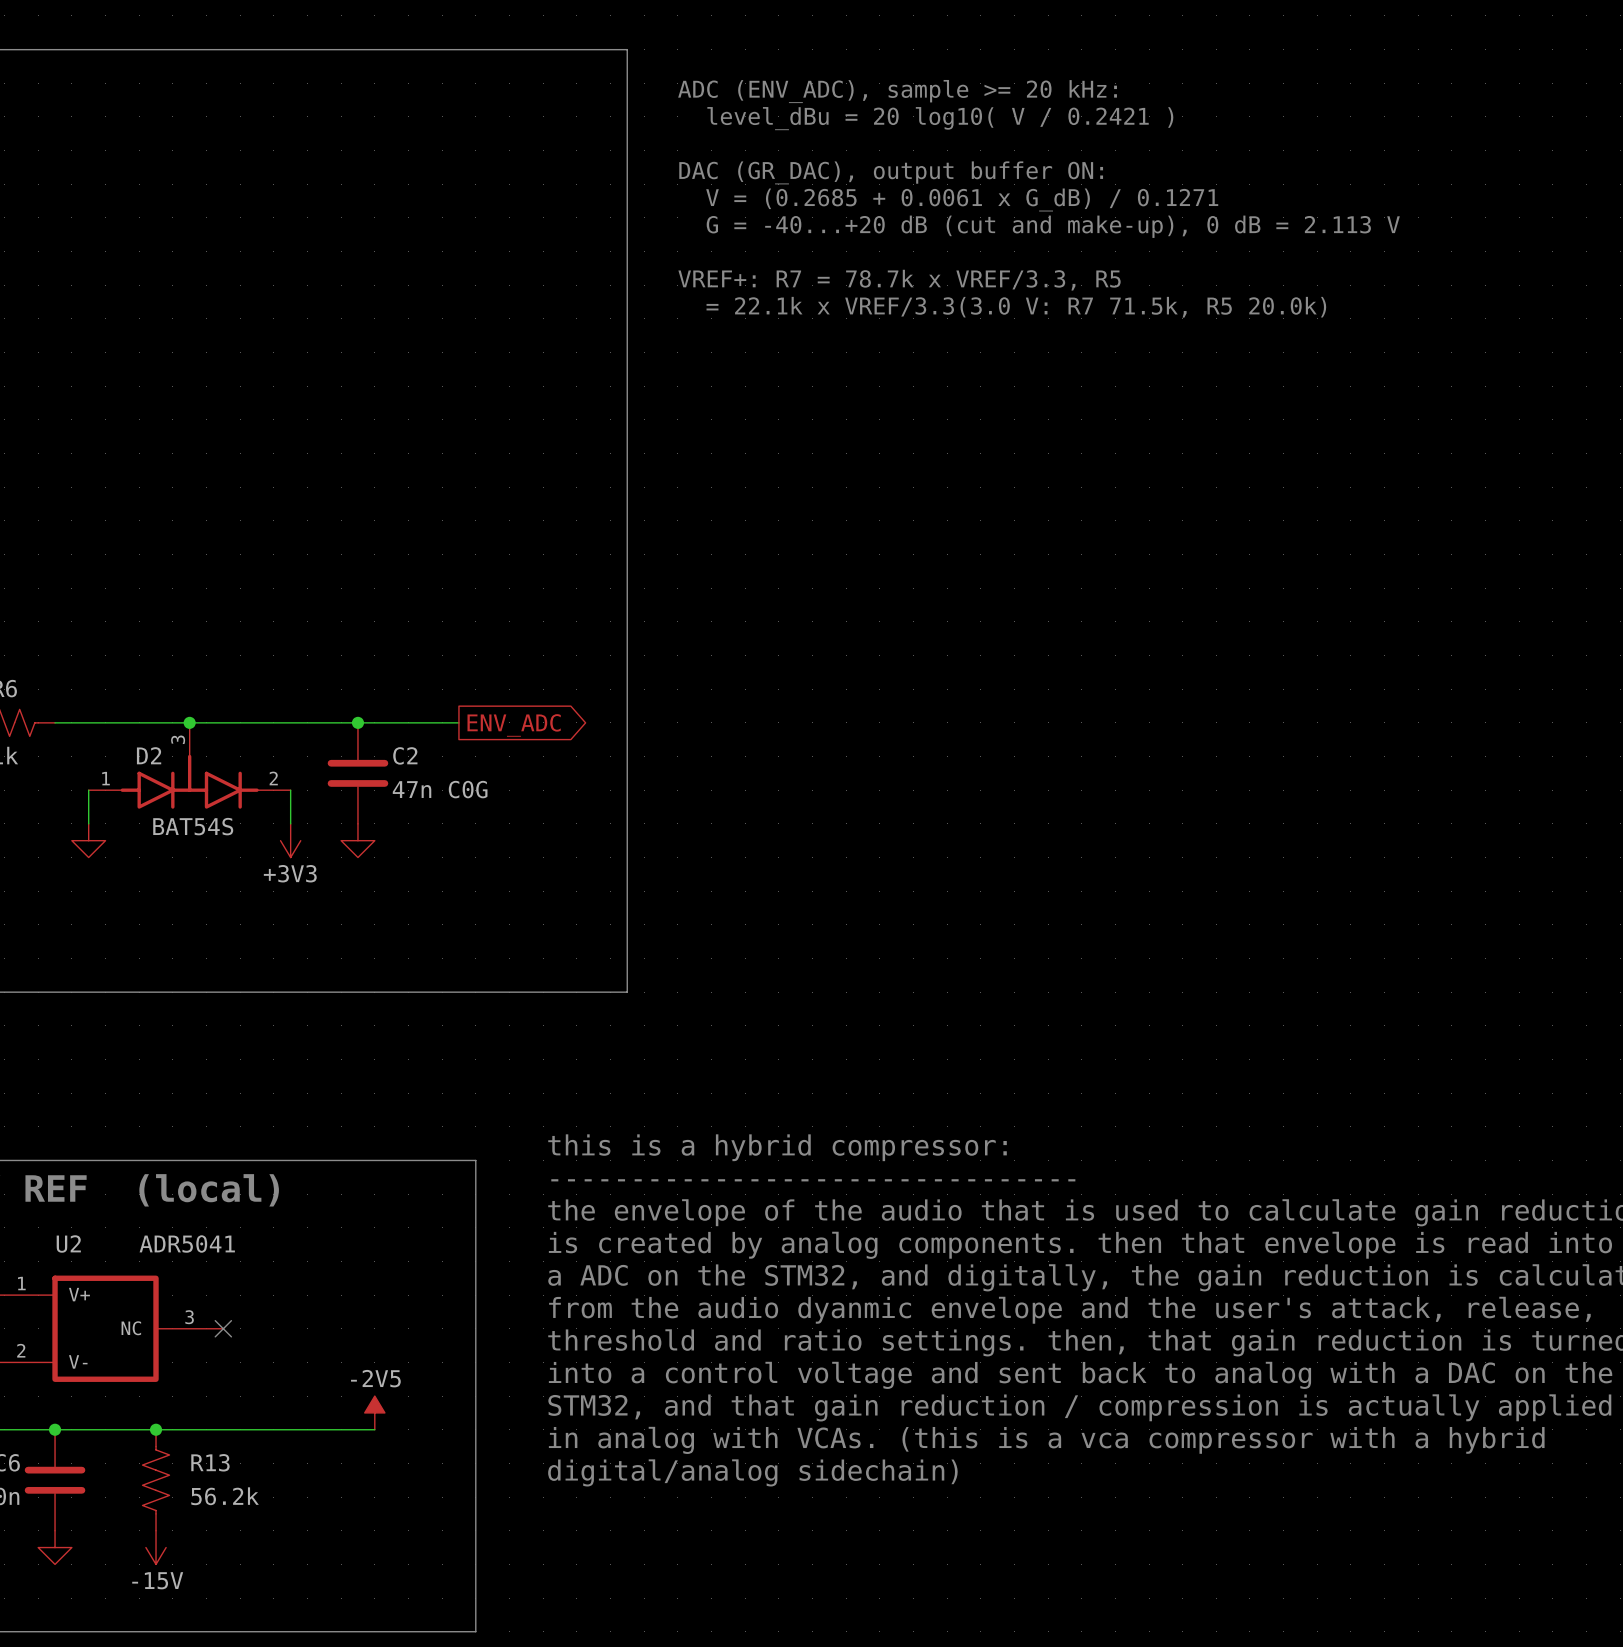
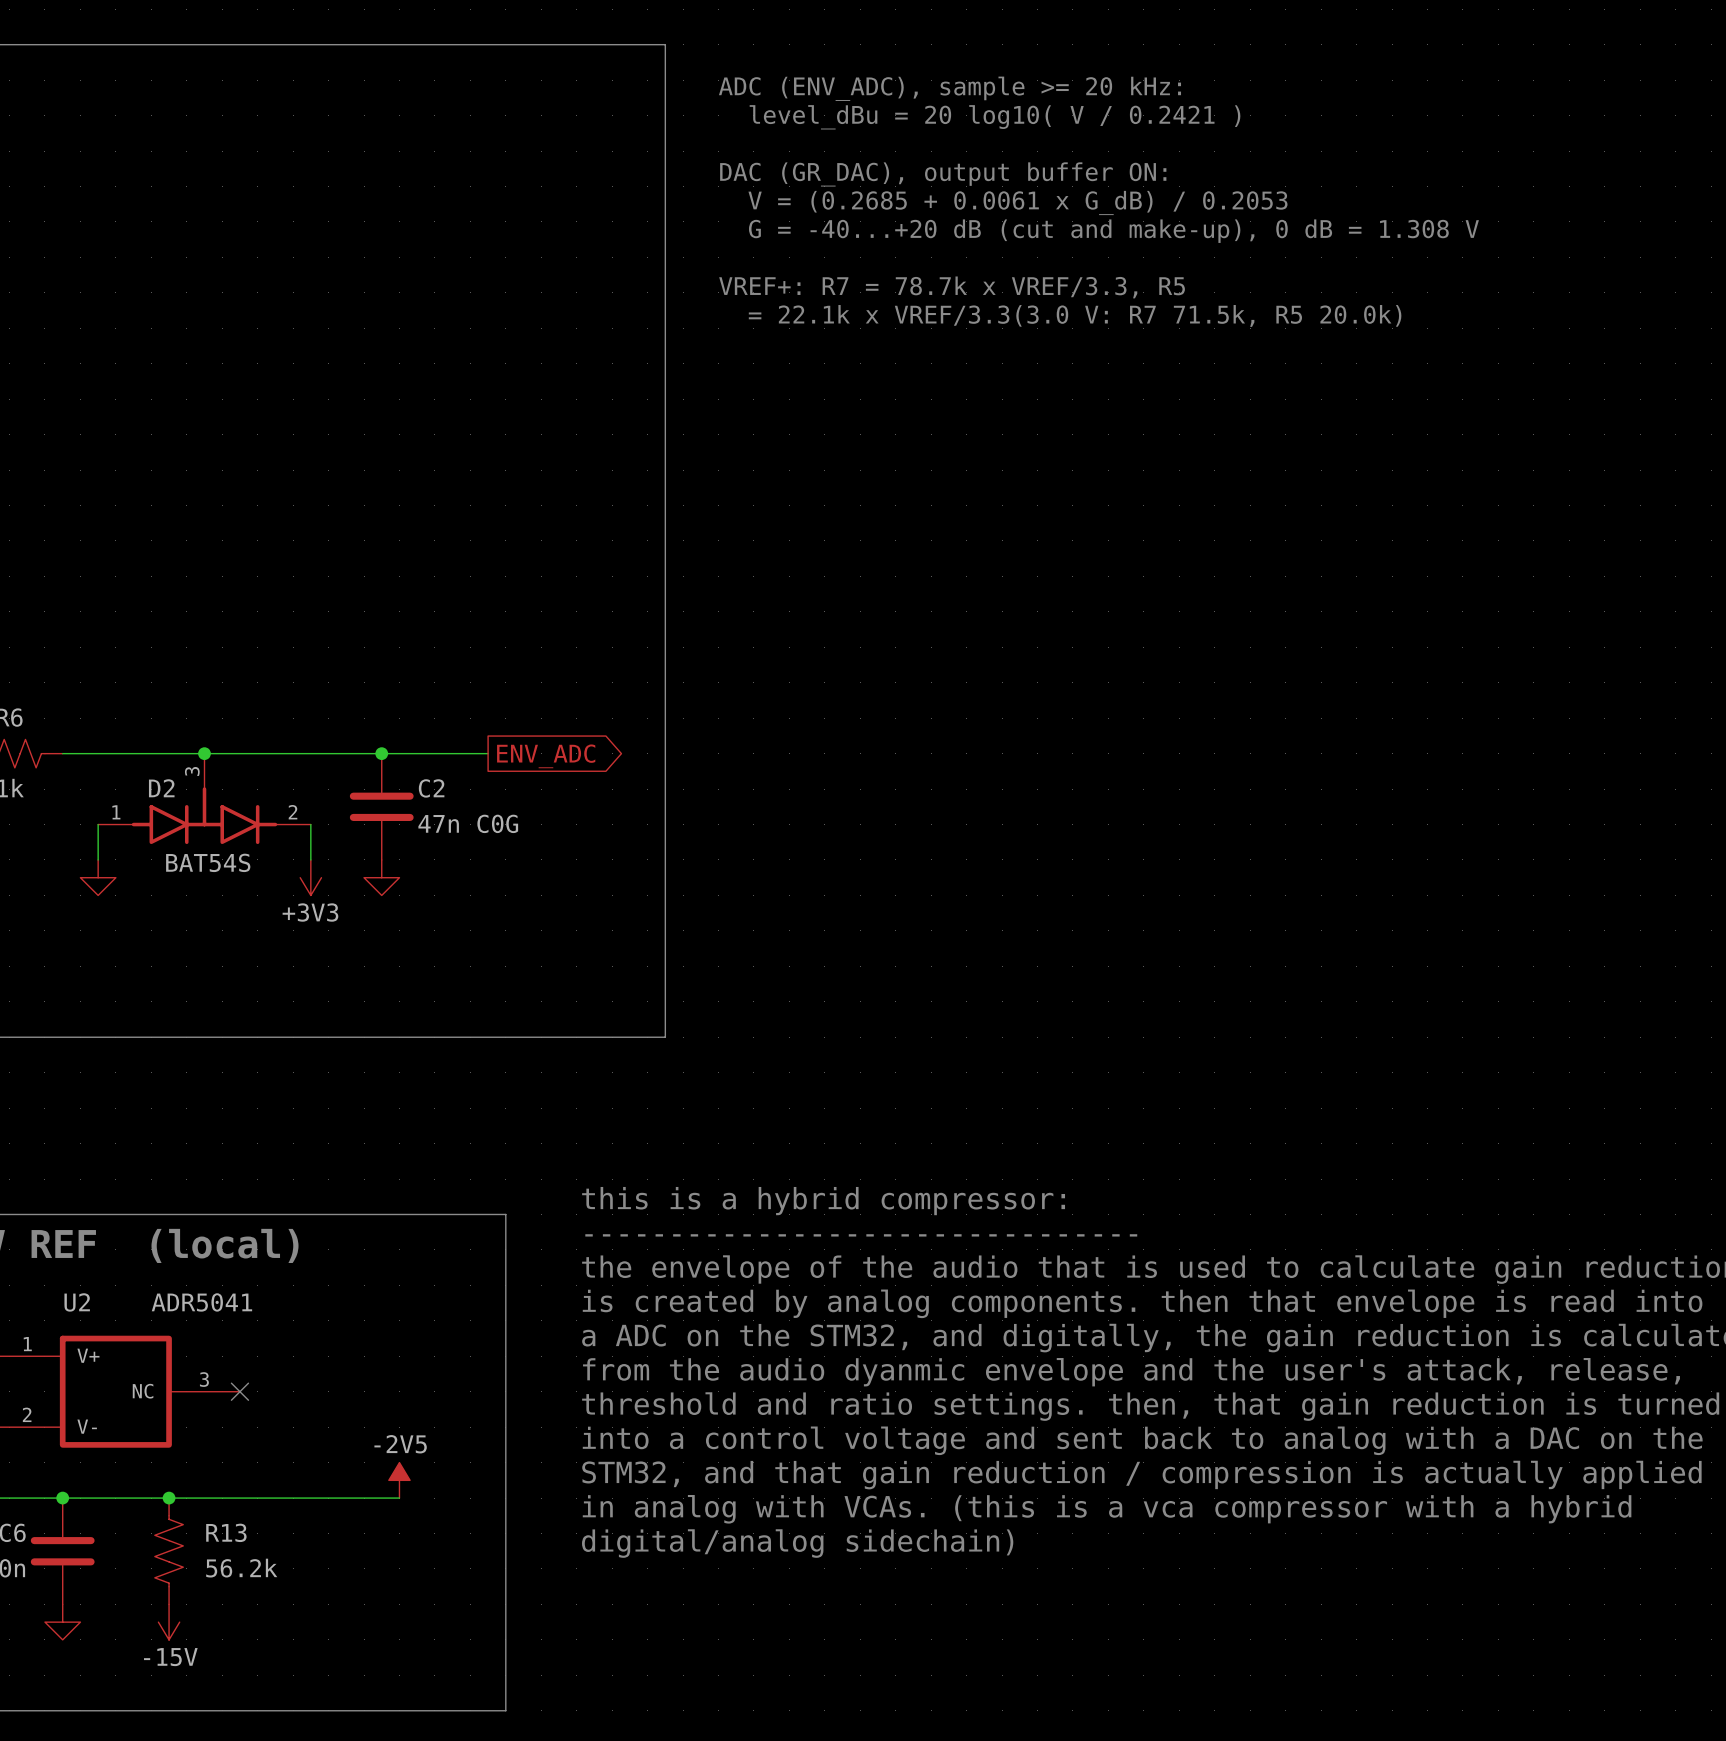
text: V = (0.2685 + 0.0061 x G_dB) / 0.1271 (962, 199) -> V = (0.2685 + 0.0061 x G_dB) / 0.2053 (1017, 202)
text: G = -40...+20 dB (cut and make-up), 0 dB = 2.113 V (1053, 226) -> G = -40...+20 dB (cut and make-up), 0 dB = 1.308 V (1113, 231)

